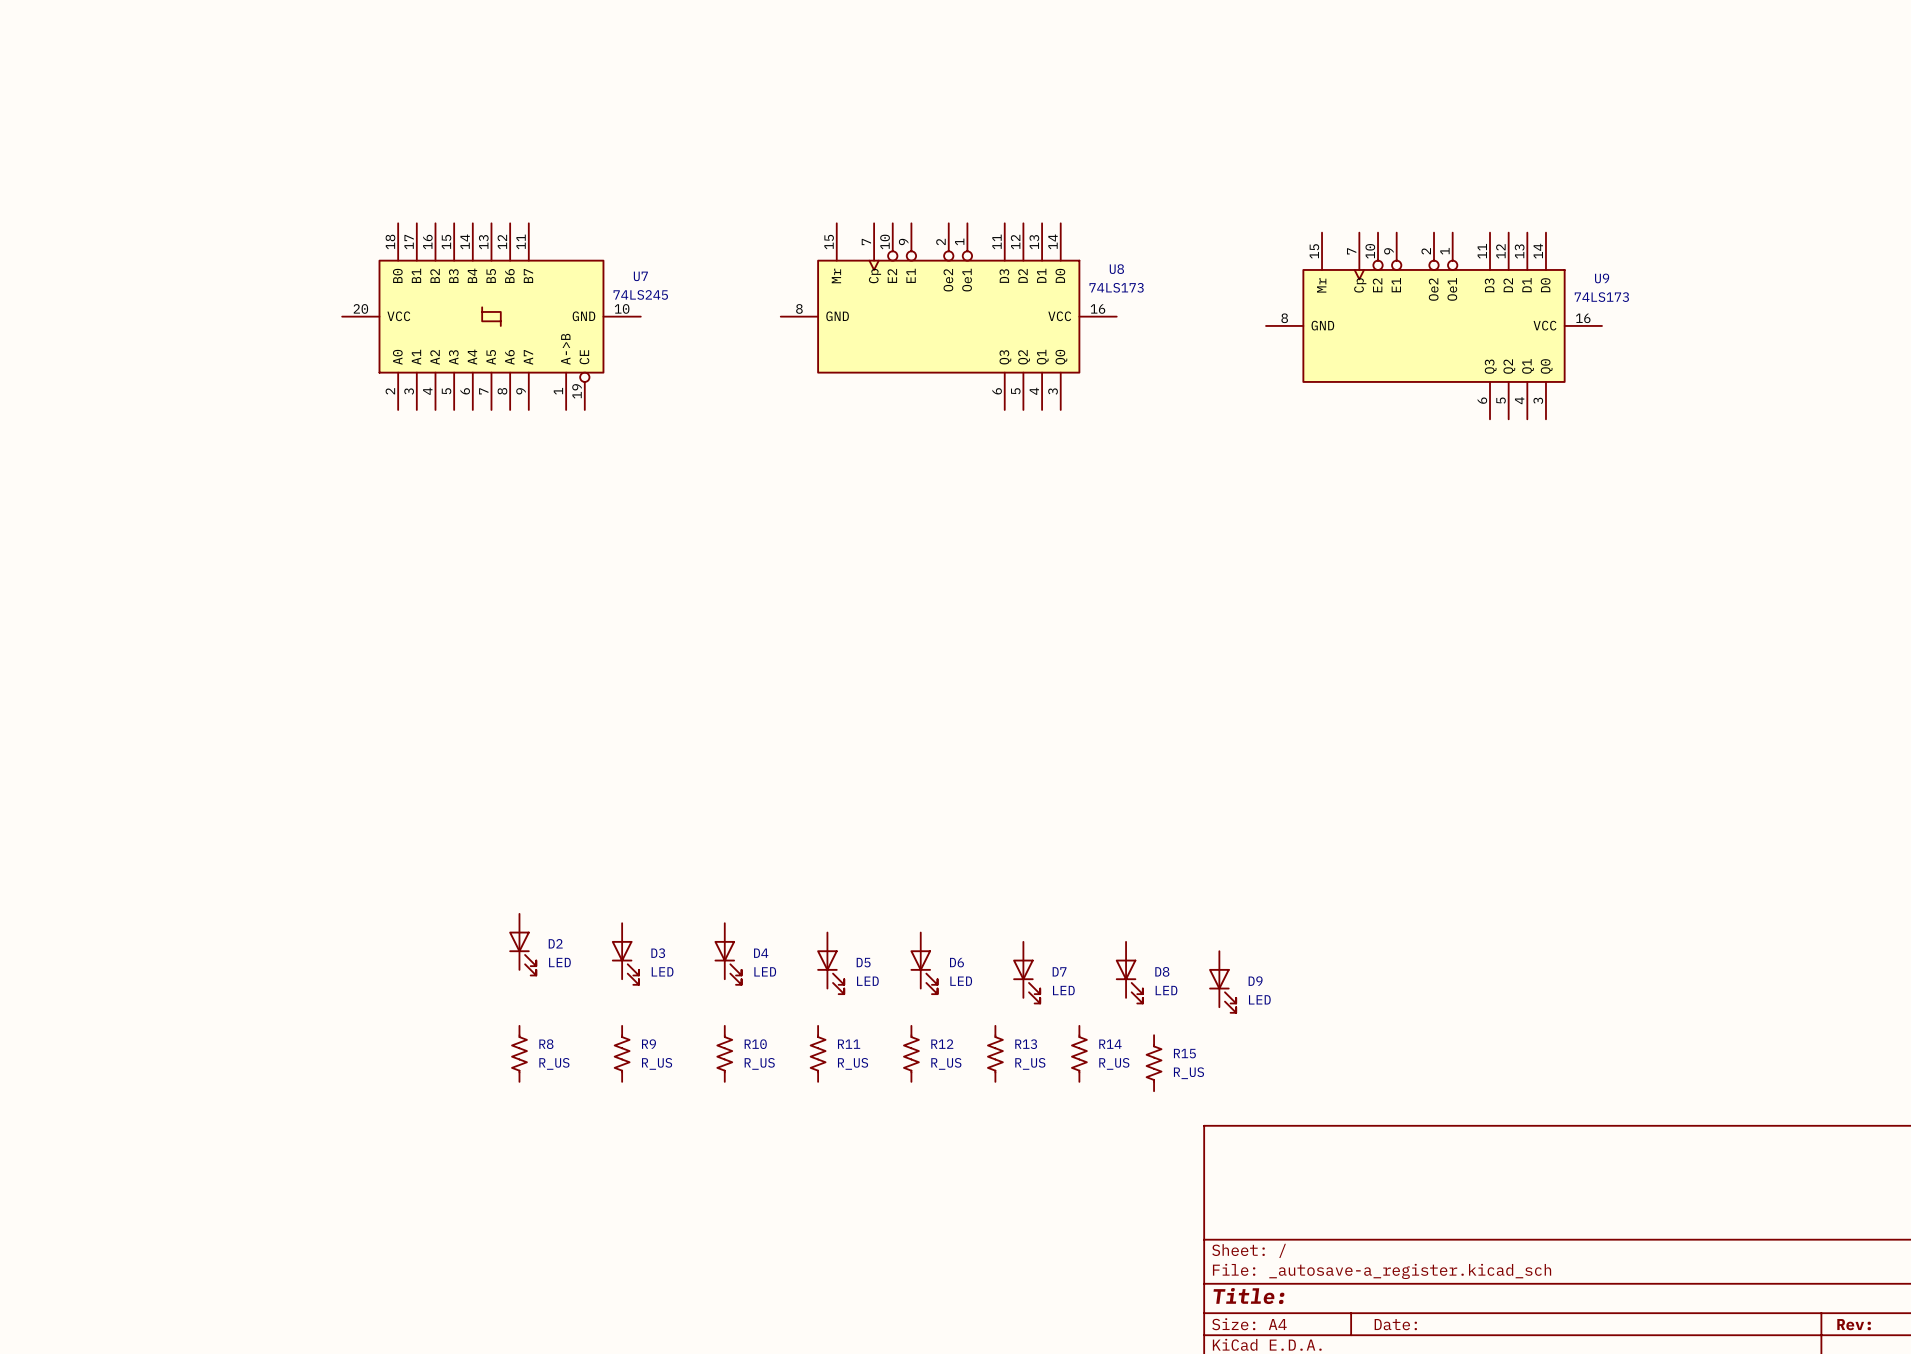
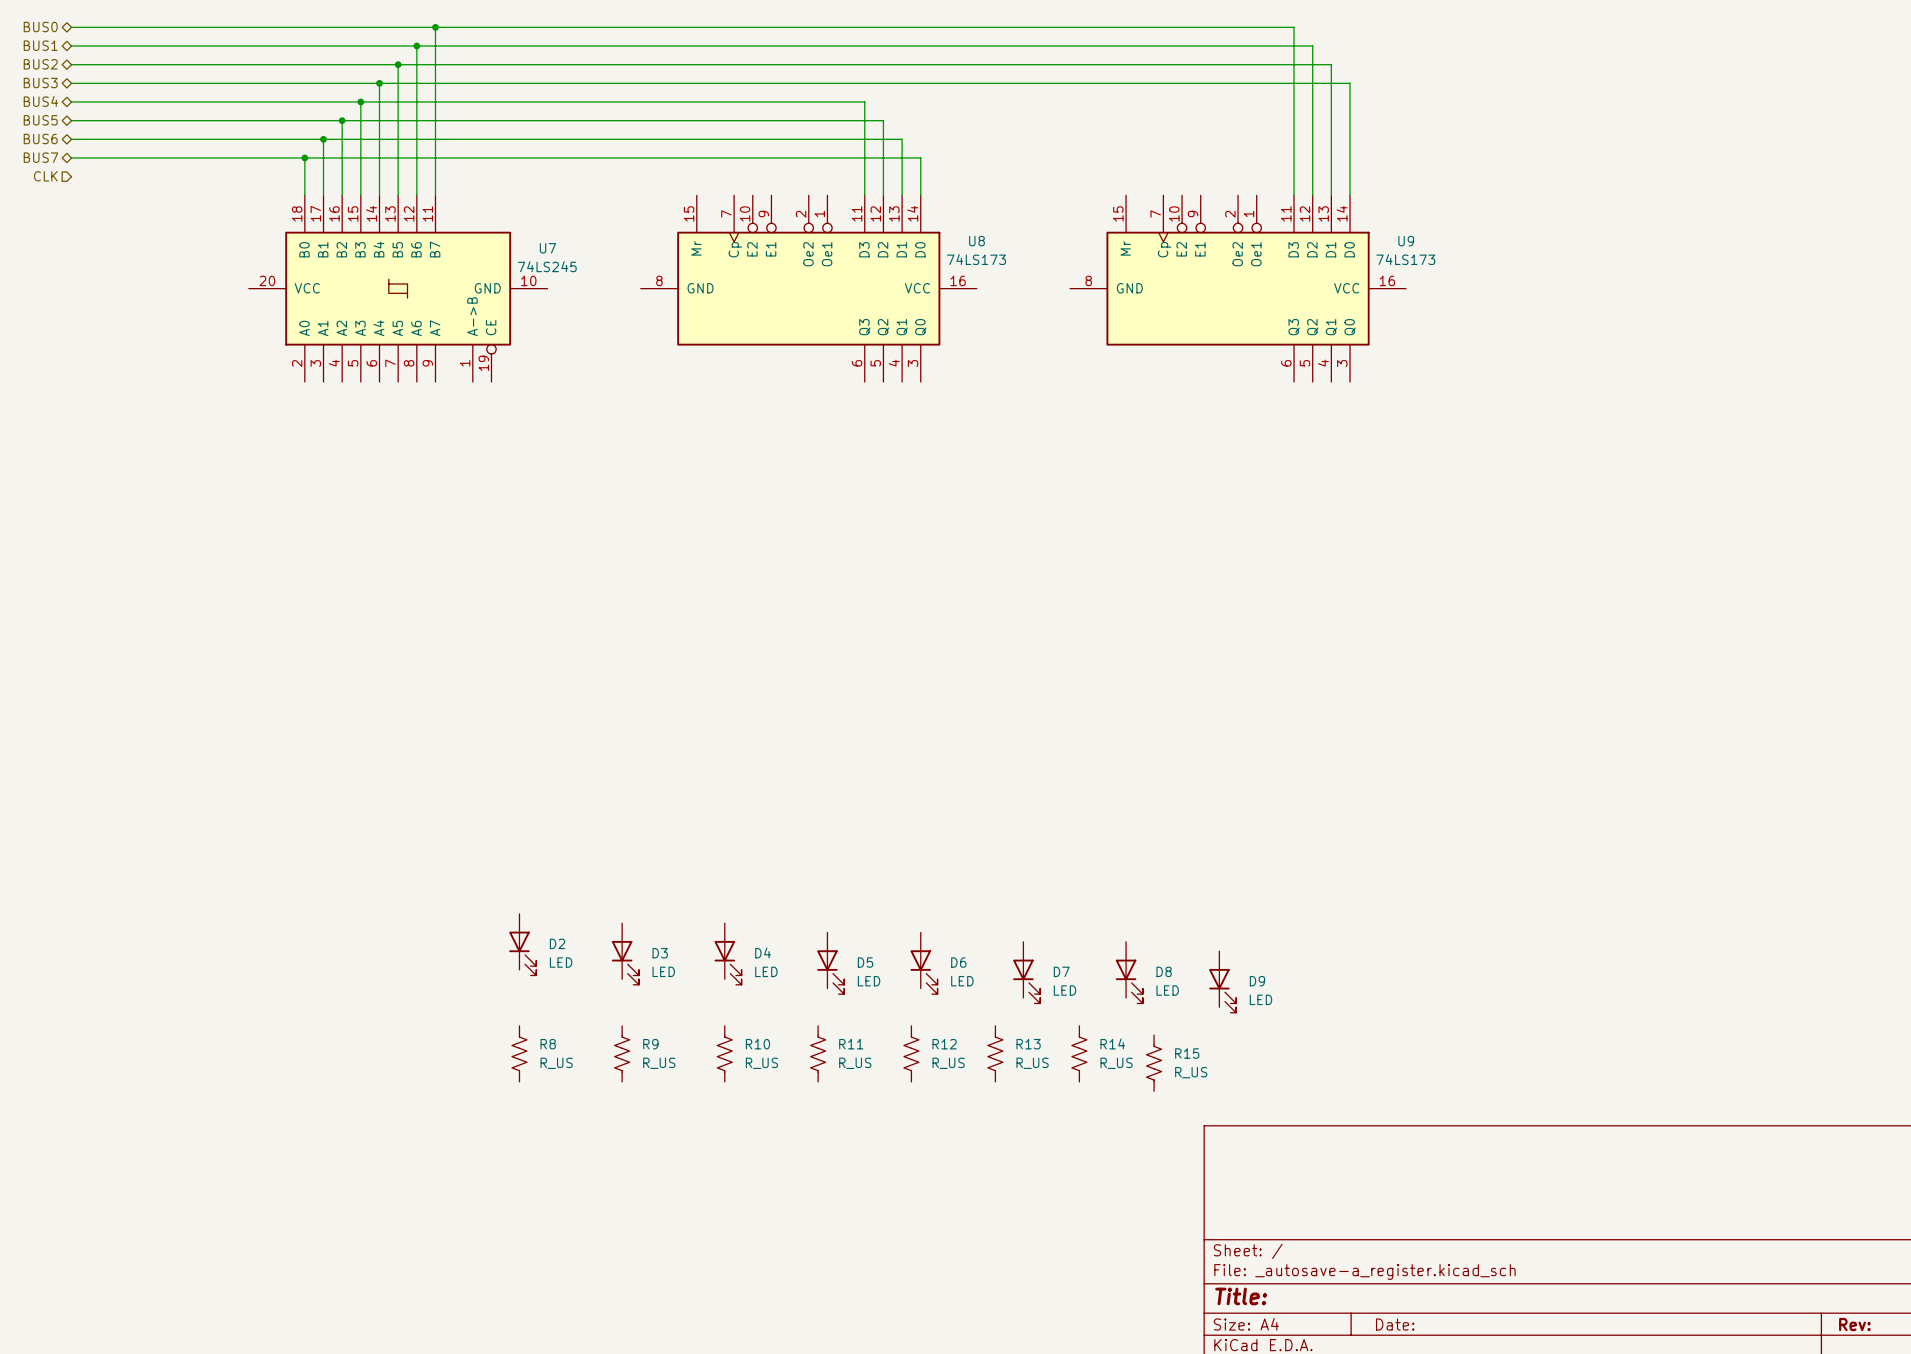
hierarchical label: none -> BUS0 (40, 27)
wire: none -> (71, 27) (1294, 27) (1294, 195)
wire: none -> (435, 27) (435, 195)
junction: none -> (435, 27)
hierarchical label: none -> BUS1 (40, 45)
wire: none -> (71, 46) (1312, 46) (1312, 195)
wire: none -> (416, 46) (416, 195)
junction: none -> (416, 46)
hierarchical label: none -> BUS2 (40, 64)
wire: none -> (71, 64) (1331, 64) (1331, 195)
wire: none -> (398, 64) (398, 195)
junction: none -> (398, 64)
hierarchical label: none -> BUS3 (40, 82)
wire: none -> (71, 83) (1350, 83) (1350, 195)
wire: none -> (379, 83) (379, 195)
junction: none -> (379, 83)
hierarchical label: none -> BUS4 (40, 101)
wire: none -> (71, 102) (864, 102) (864, 195)
wire: none -> (360, 102) (360, 195)
junction: none -> (360, 102)
hierarchical label: none -> BUS5 (40, 120)
wire: none -> (71, 120) (883, 120) (883, 195)
wire: none -> (342, 120) (342, 195)
junction: none -> (342, 120)
hierarchical label: none -> BUS6 (40, 138)
wire: none -> (71, 139) (902, 139) (902, 195)
wire: none -> (323, 139) (323, 195)
junction: none -> (323, 139)
hierarchical label: none -> BUS7 (40, 157)
wire: none -> (71, 158) (920, 158) (920, 195)
wire: none -> (304, 158) (304, 195)
junction: none -> (304, 158)
hierarchical label: none -> CLK (45, 176)
U7 position: (491, 316) -> (398, 288)
U8 position: (948, 316) -> (808, 288)
U9 position: (1434, 325) -> (1238, 288)

